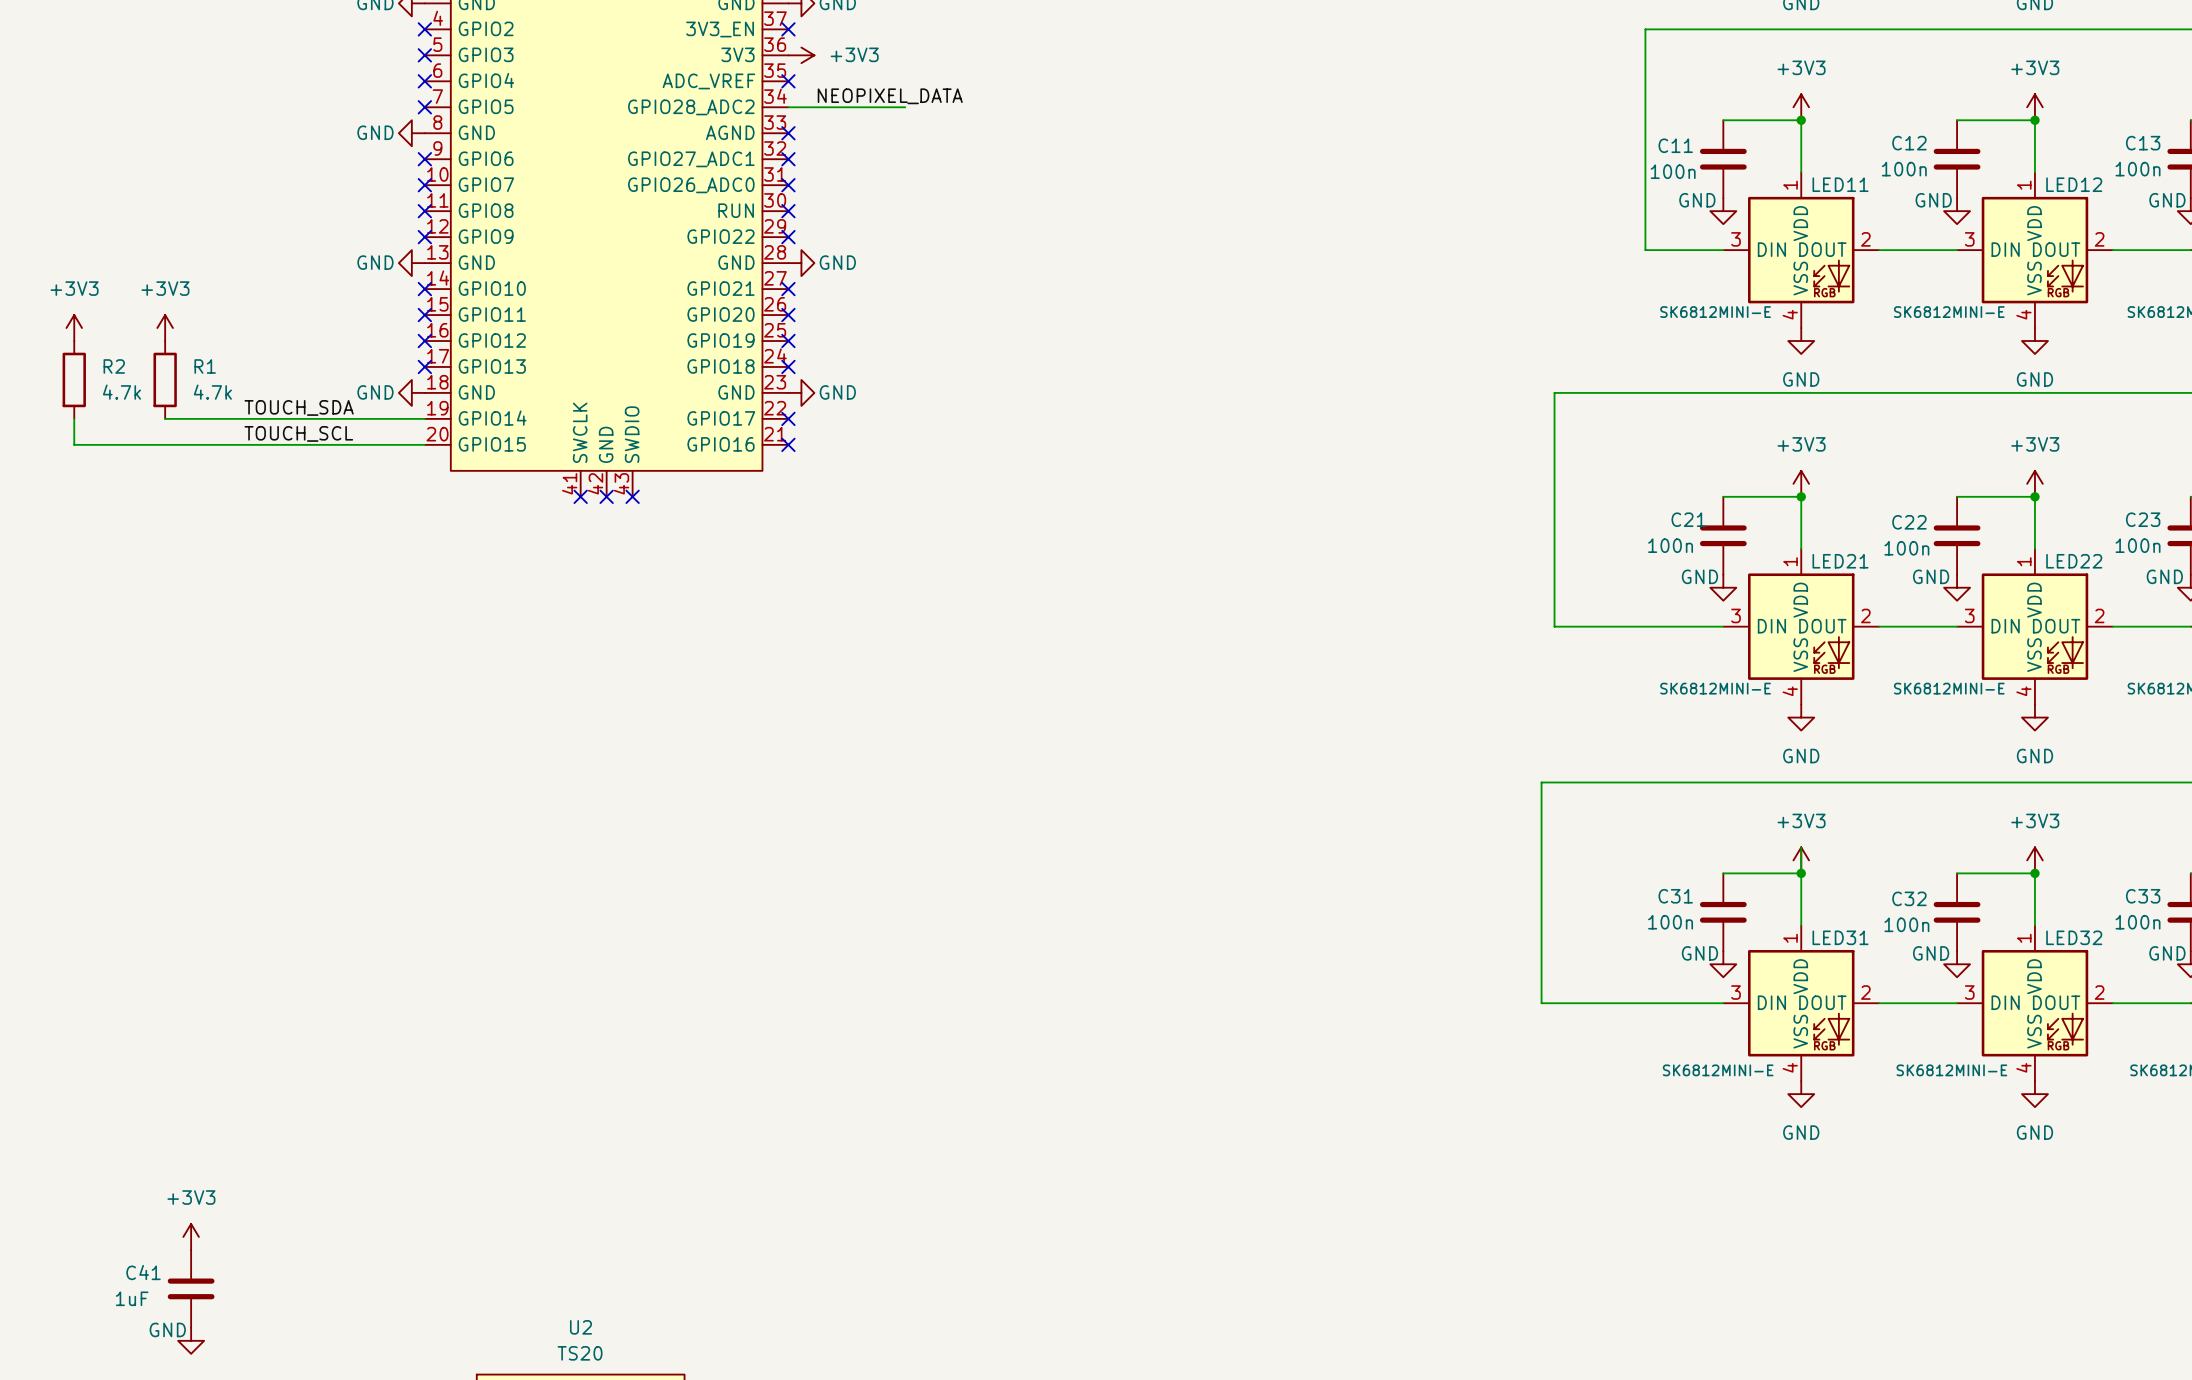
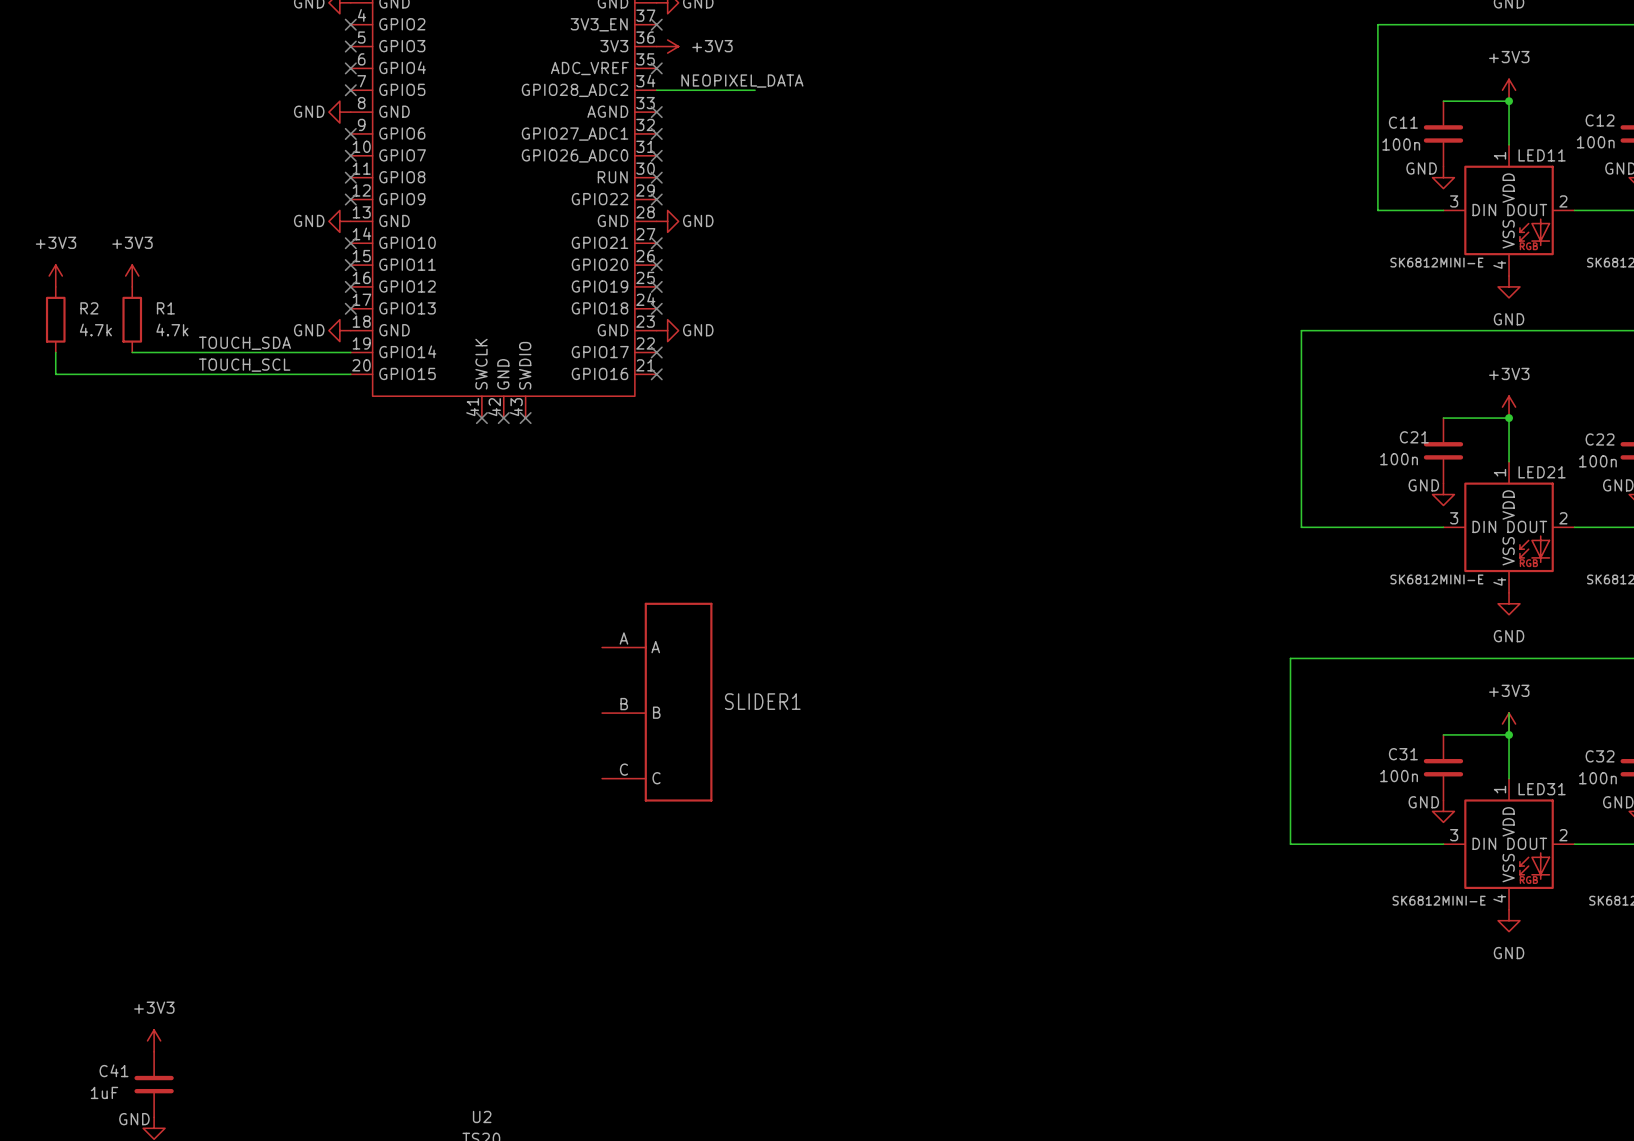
SLIDER1: none -> (657, 702)

